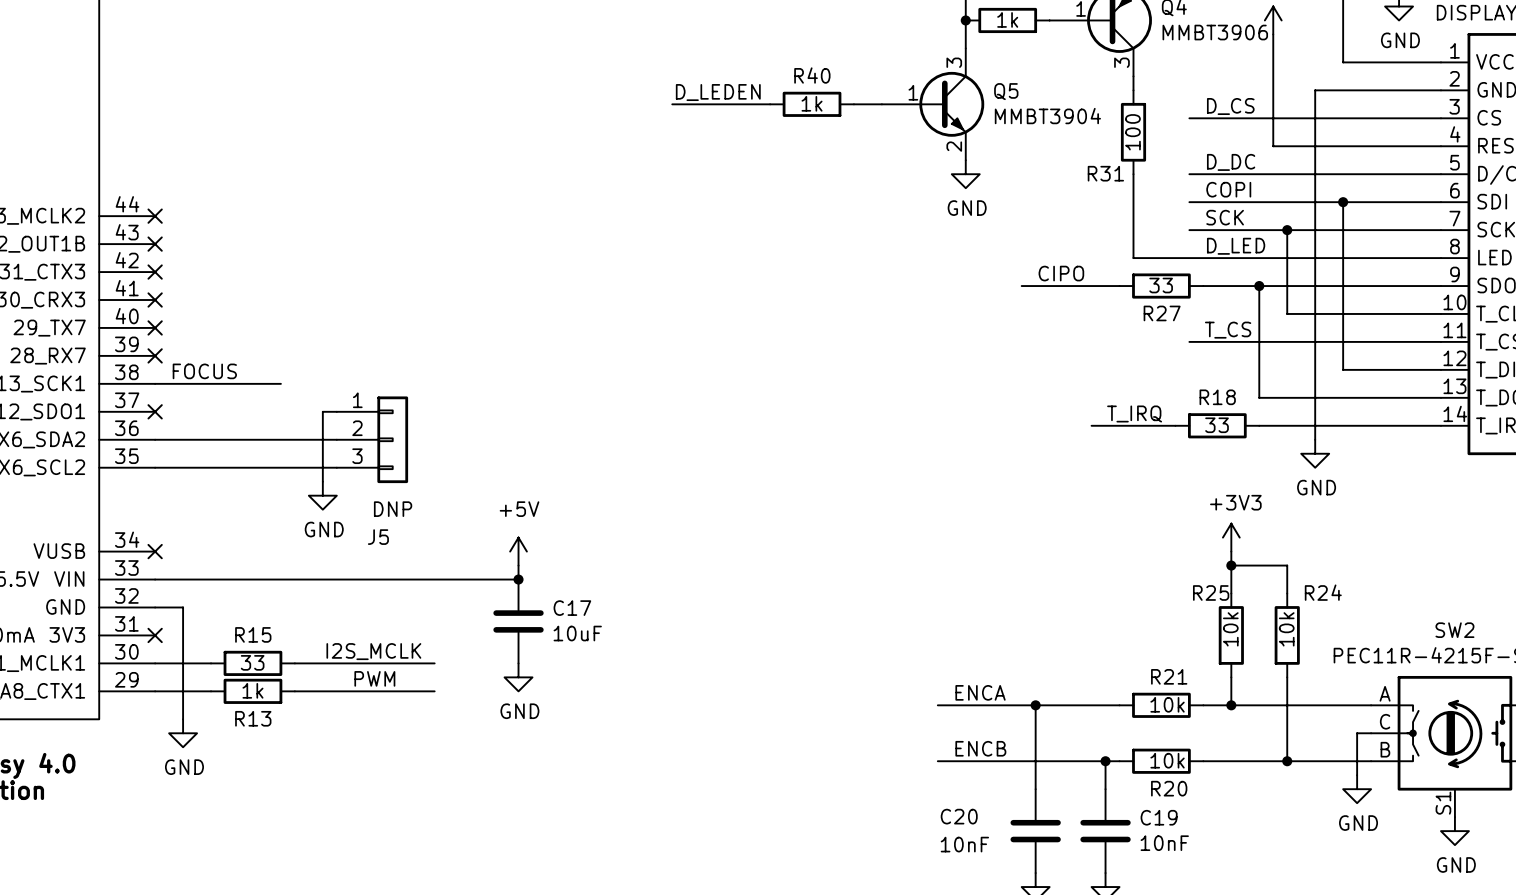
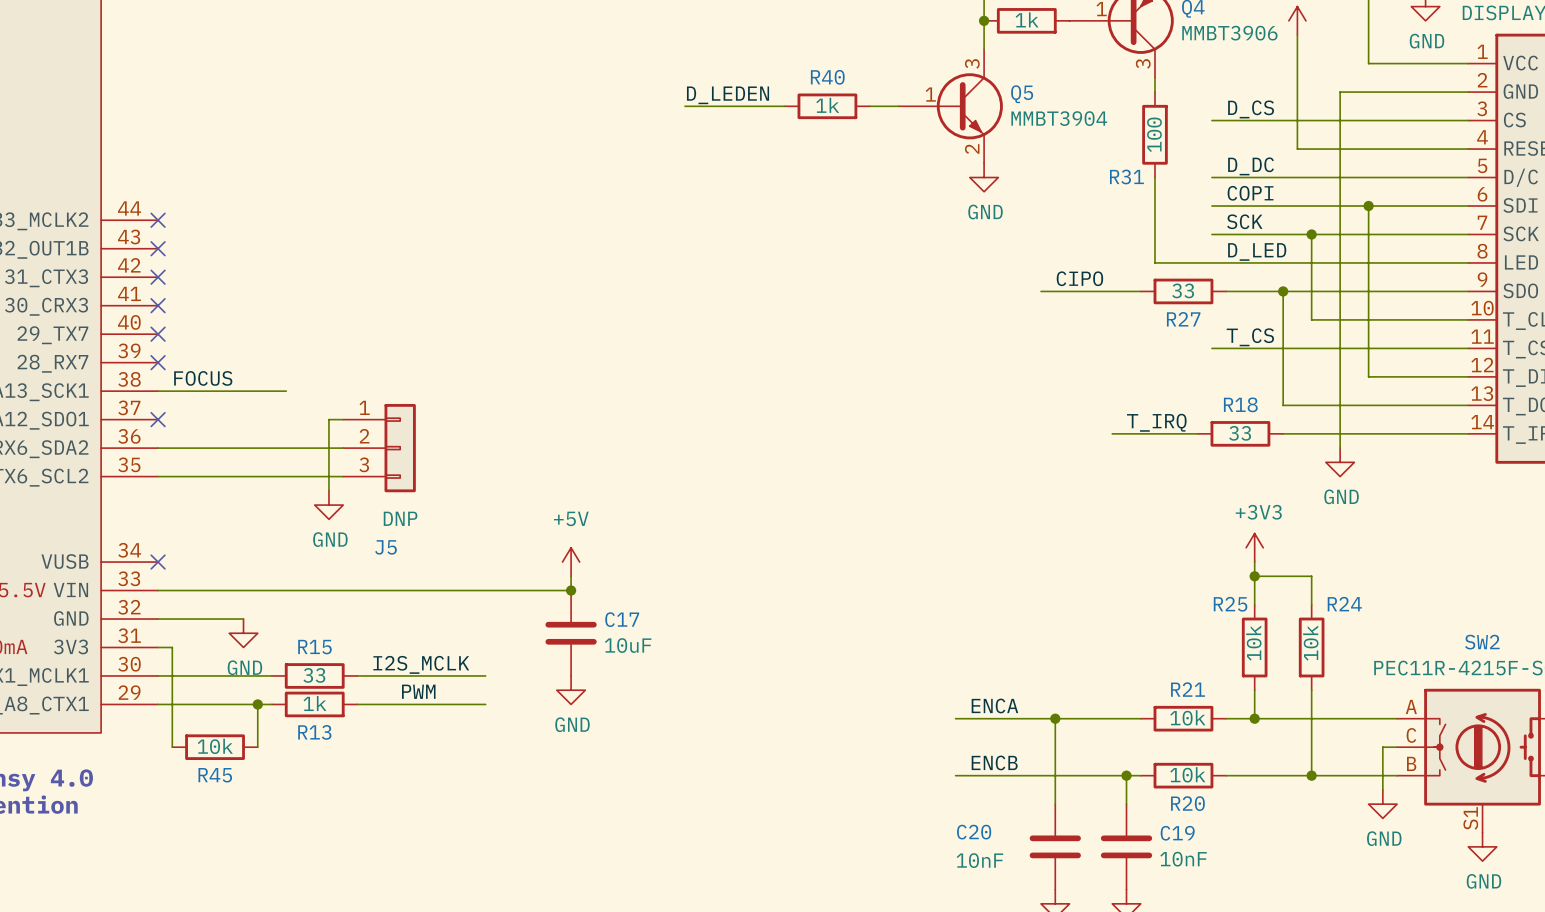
power symbol position: +5V (518, 551) -> +5V (571, 562)
wire: (518, 565) (518, 579) -> (571, 576) (571, 590) (528, 590)
junction position: (518, 579) -> (571, 590)
wire: (183, 607) (183, 719) -> (186, 619) (243, 619)
C17 position: (518, 621) -> (571, 633)
wire: none -> (158, 647) (172, 647) (172, 747)
no-connect mark: (155, 635) -> none
label position: I2S_MCLK (373, 651) -> I2S_MCLK (421, 664)
R15 position: (252, 663) -> (314, 675)
wire: (294, 663) (350, 663) -> (215, 675) (272, 675)
wire: none -> (442, 675) (485, 675)
power symbol position: GND (518, 677) -> GND (571, 690)
label position: PWM (374, 678) -> PWM (418, 691)
wire: none -> (257, 704) (257, 747)
R13 position: (252, 691) -> (314, 704)
junction: none -> (257, 704)
wire: (294, 691) (350, 691) -> (215, 704) (272, 704)
wire: none -> (442, 704) (485, 704)
power symbol position: GND (183, 733) -> GND (243, 633)
R45: none -> 10k (215, 747)

